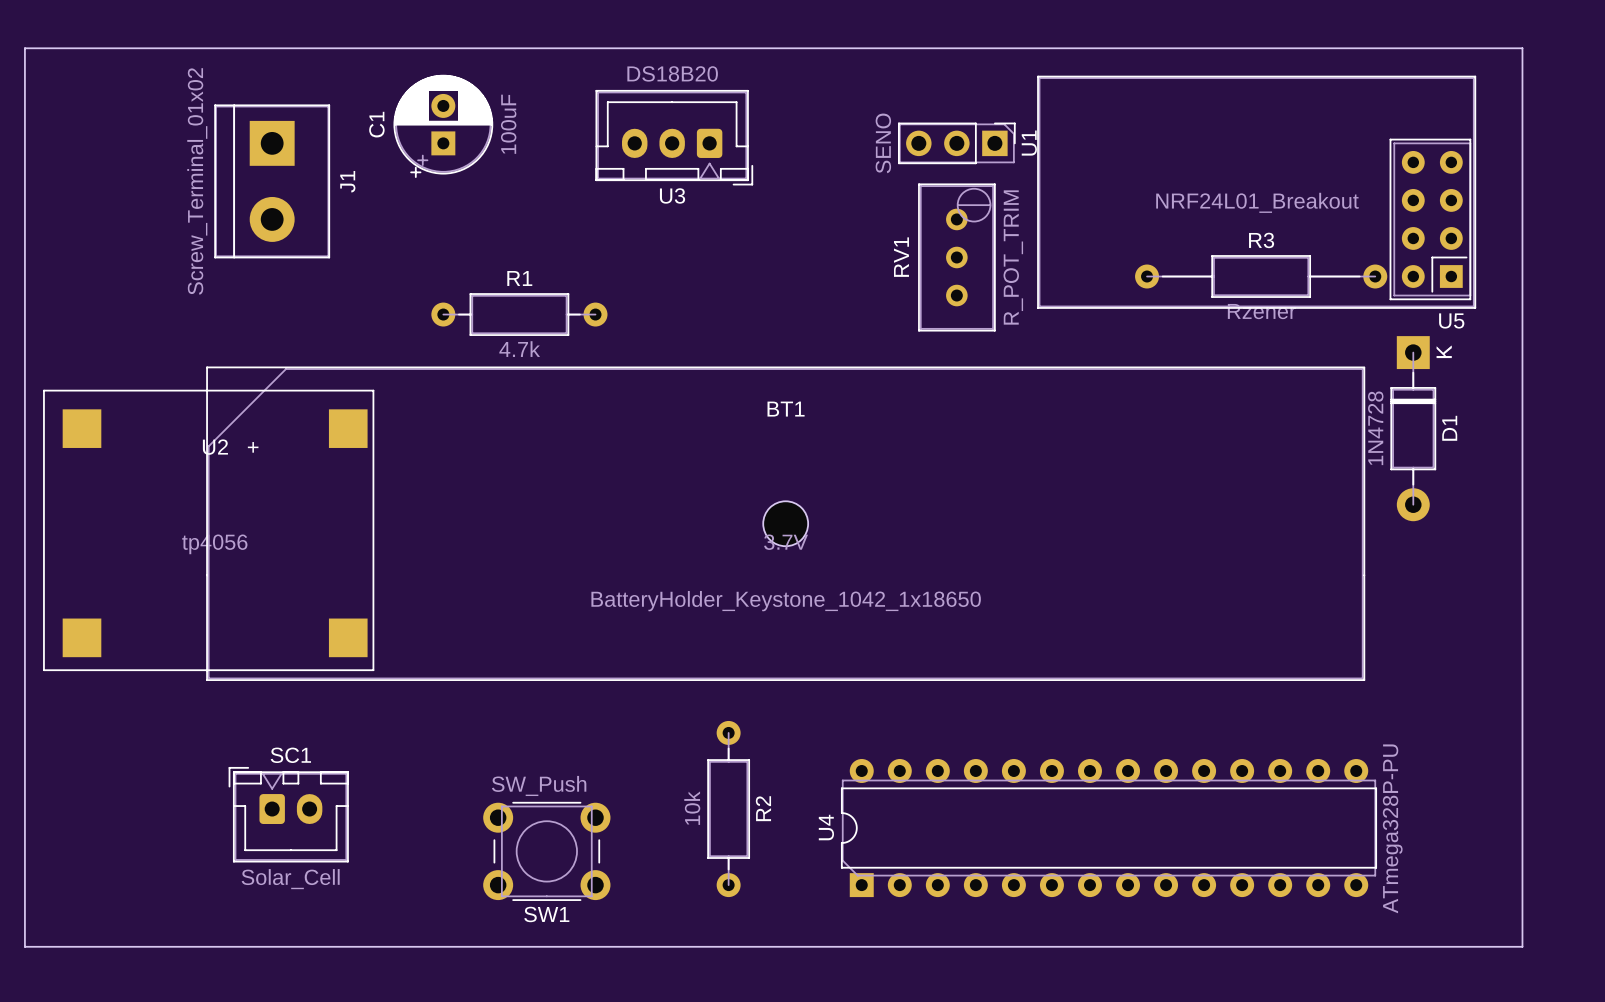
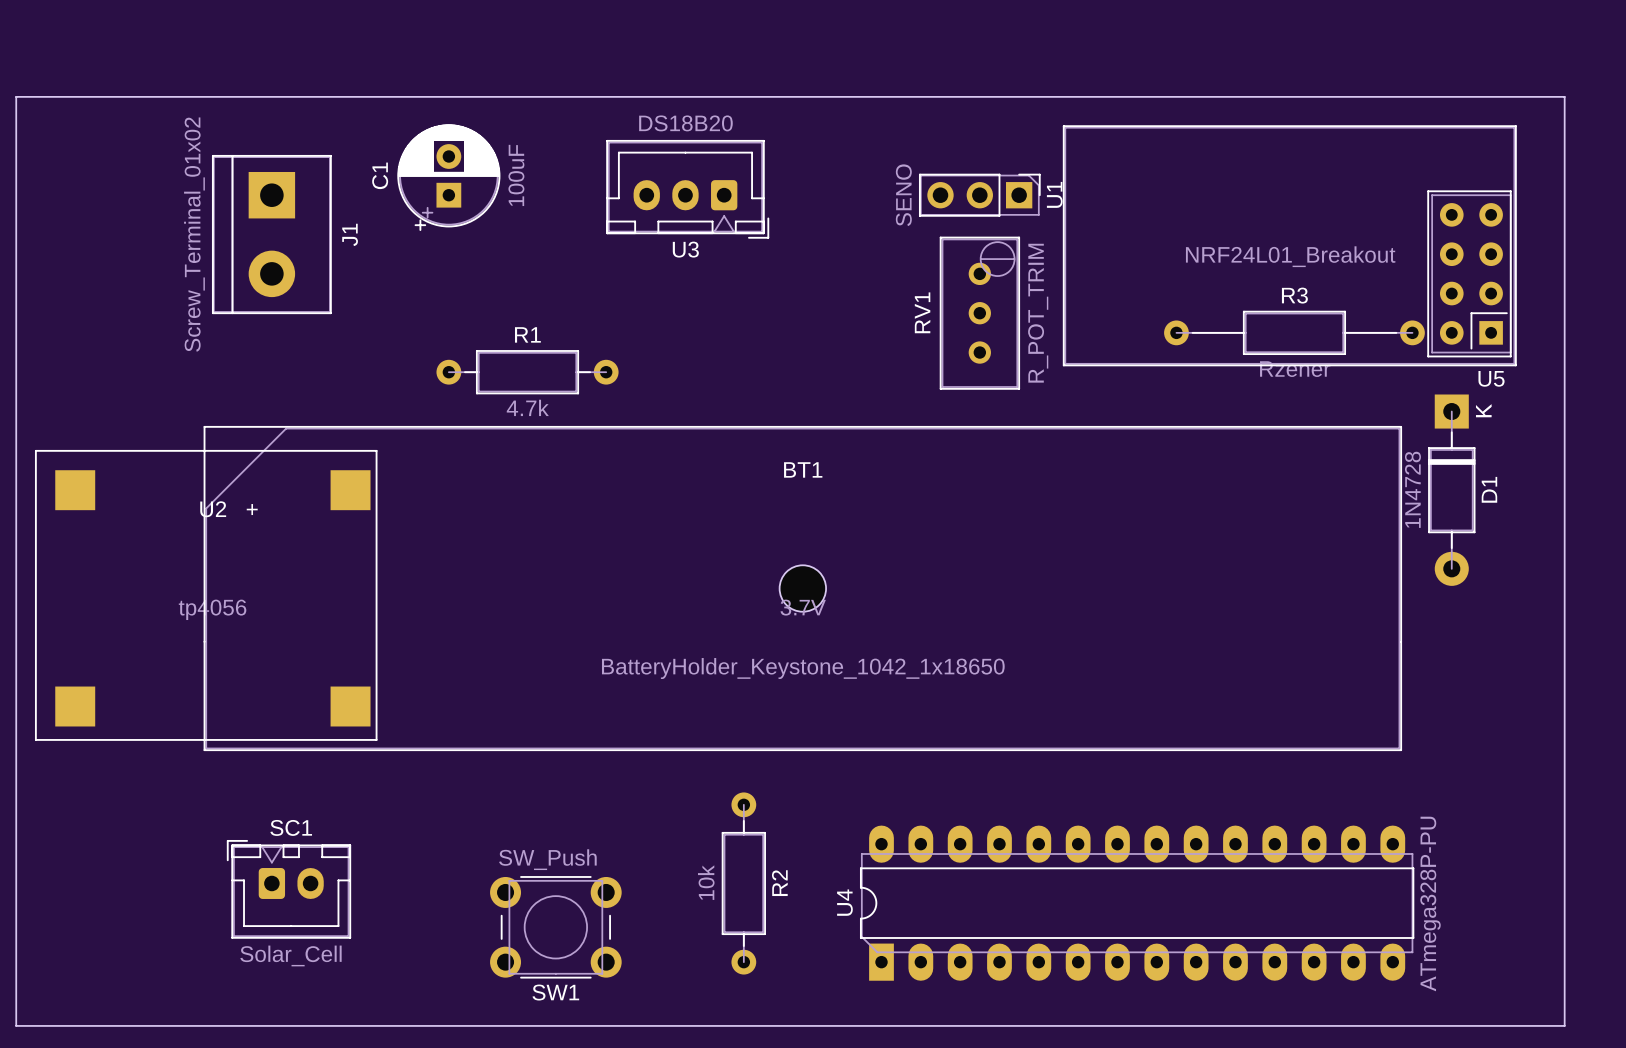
U4 footprint: [840, 759, 1378, 898] -> [859, 825, 1415, 981]

